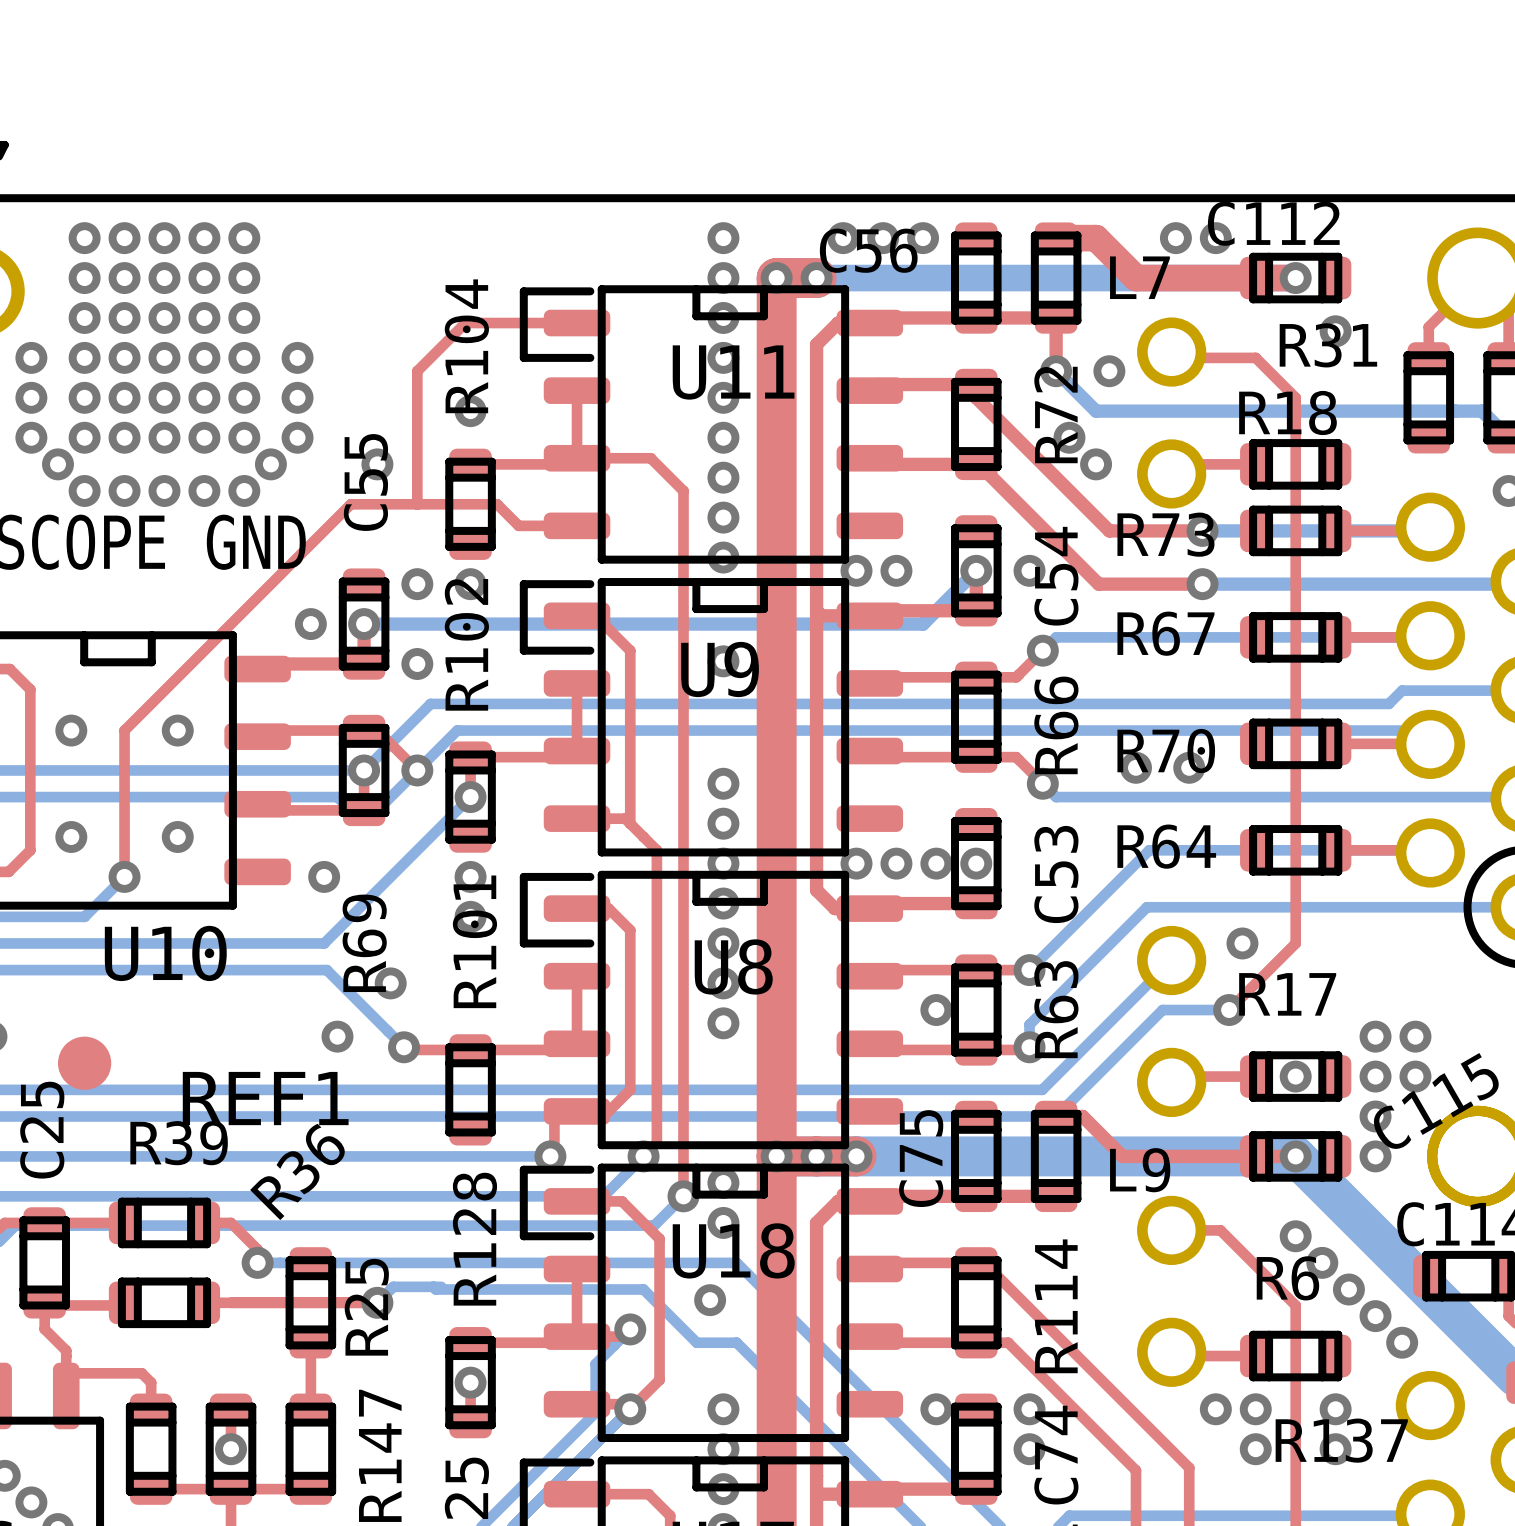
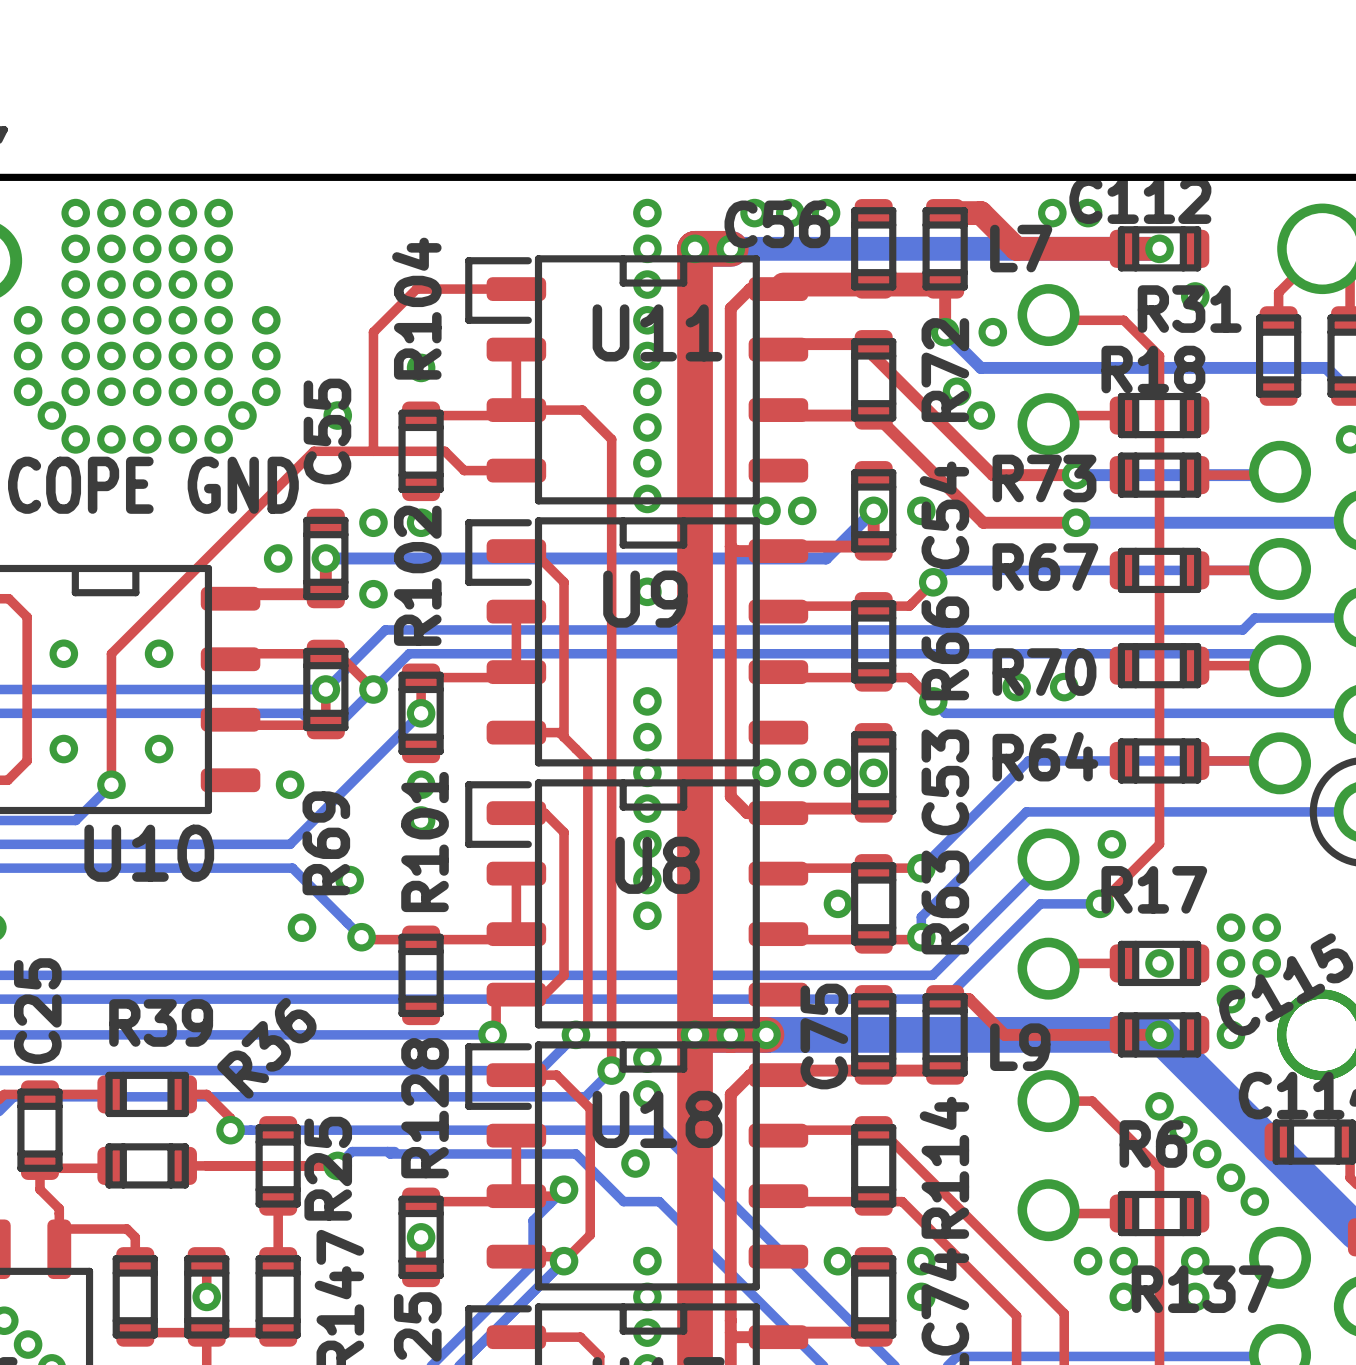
top track width: thin (874, 317) (1056, 317) -> thick (782, 284) (945, 284)
REF1: (84, 1063) -> none

